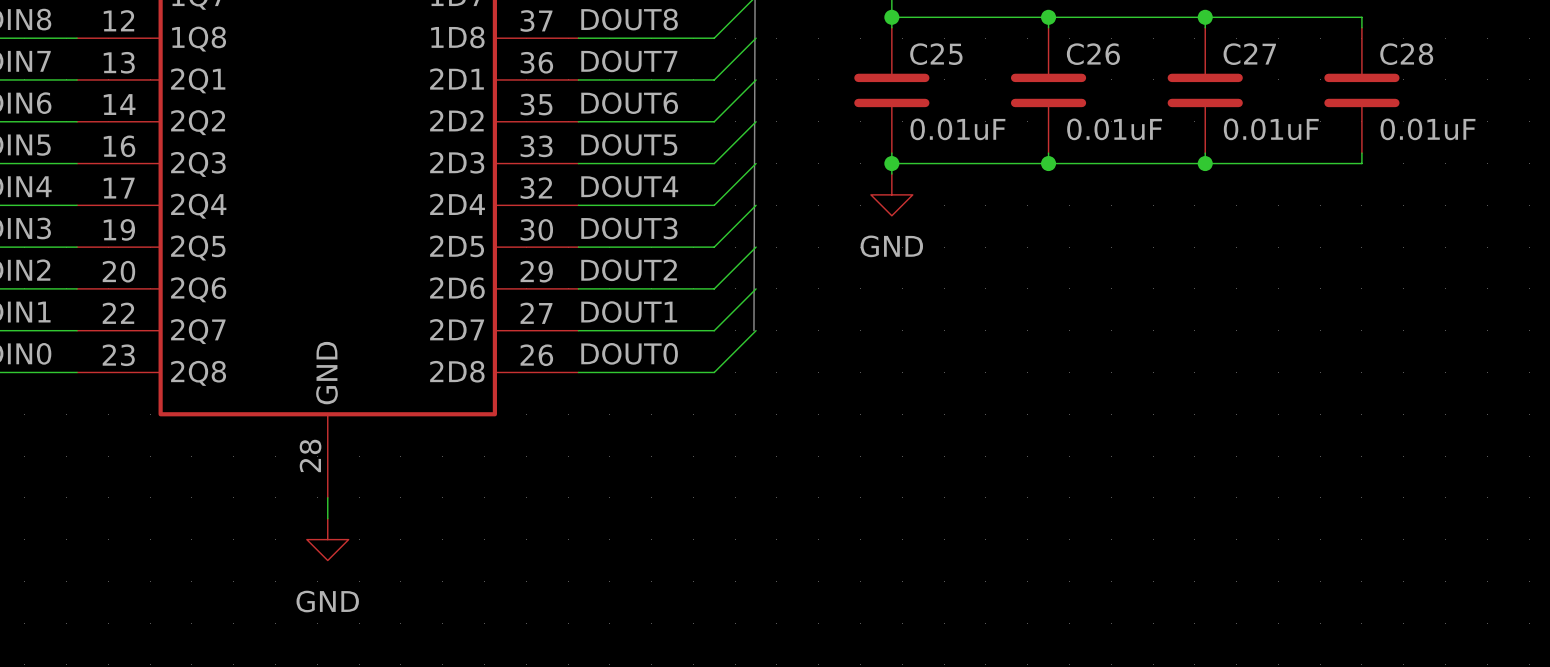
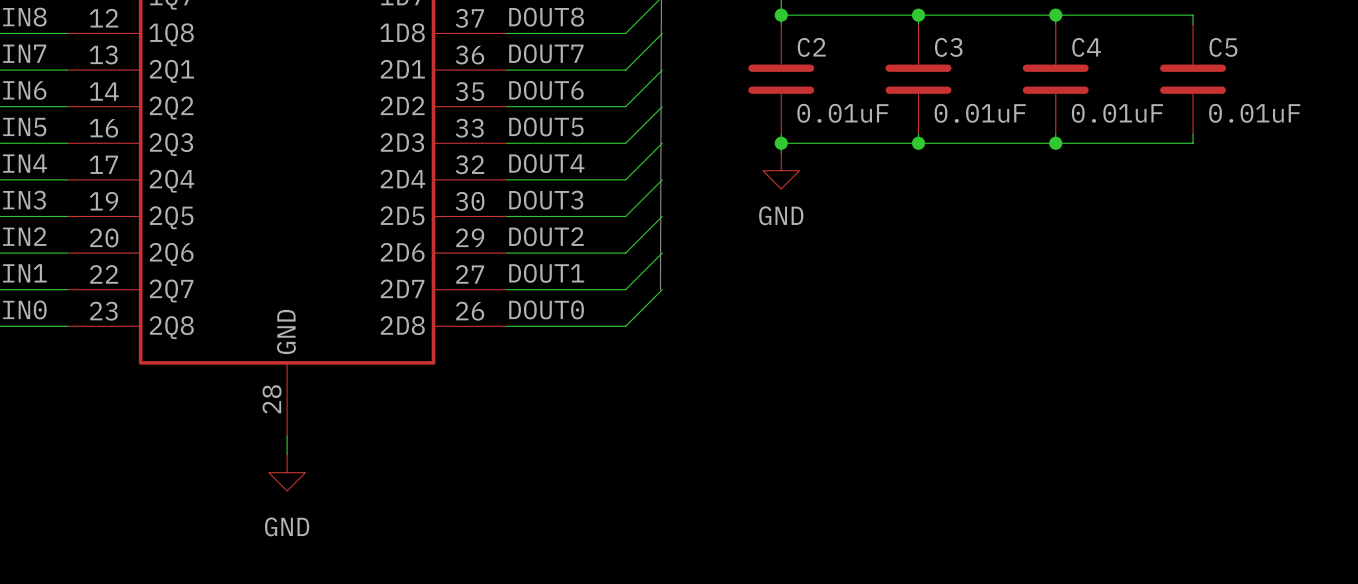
C25 name: C25 (936, 54) -> C2 (811, 47)
C26 name: C26 (1093, 54) -> C3 (948, 47)
C27 name: C27 (1249, 54) -> C4 (1086, 47)
C28 name: C28 (1406, 54) -> C5 (1223, 47)

